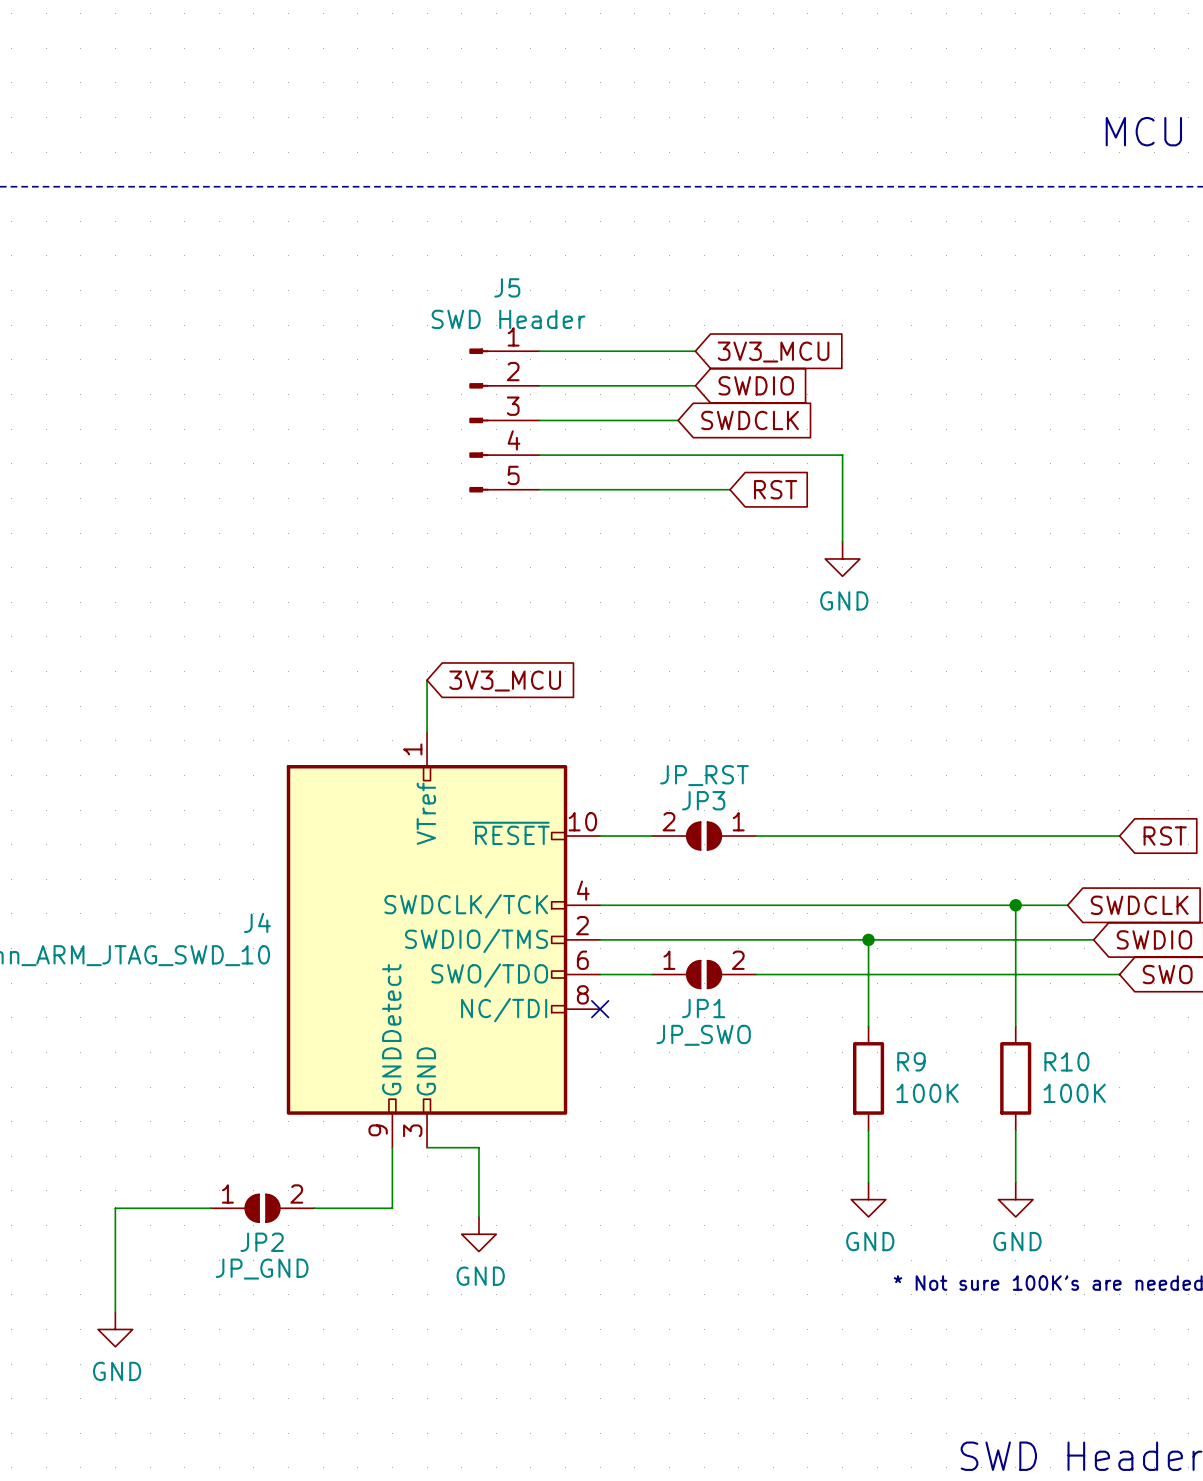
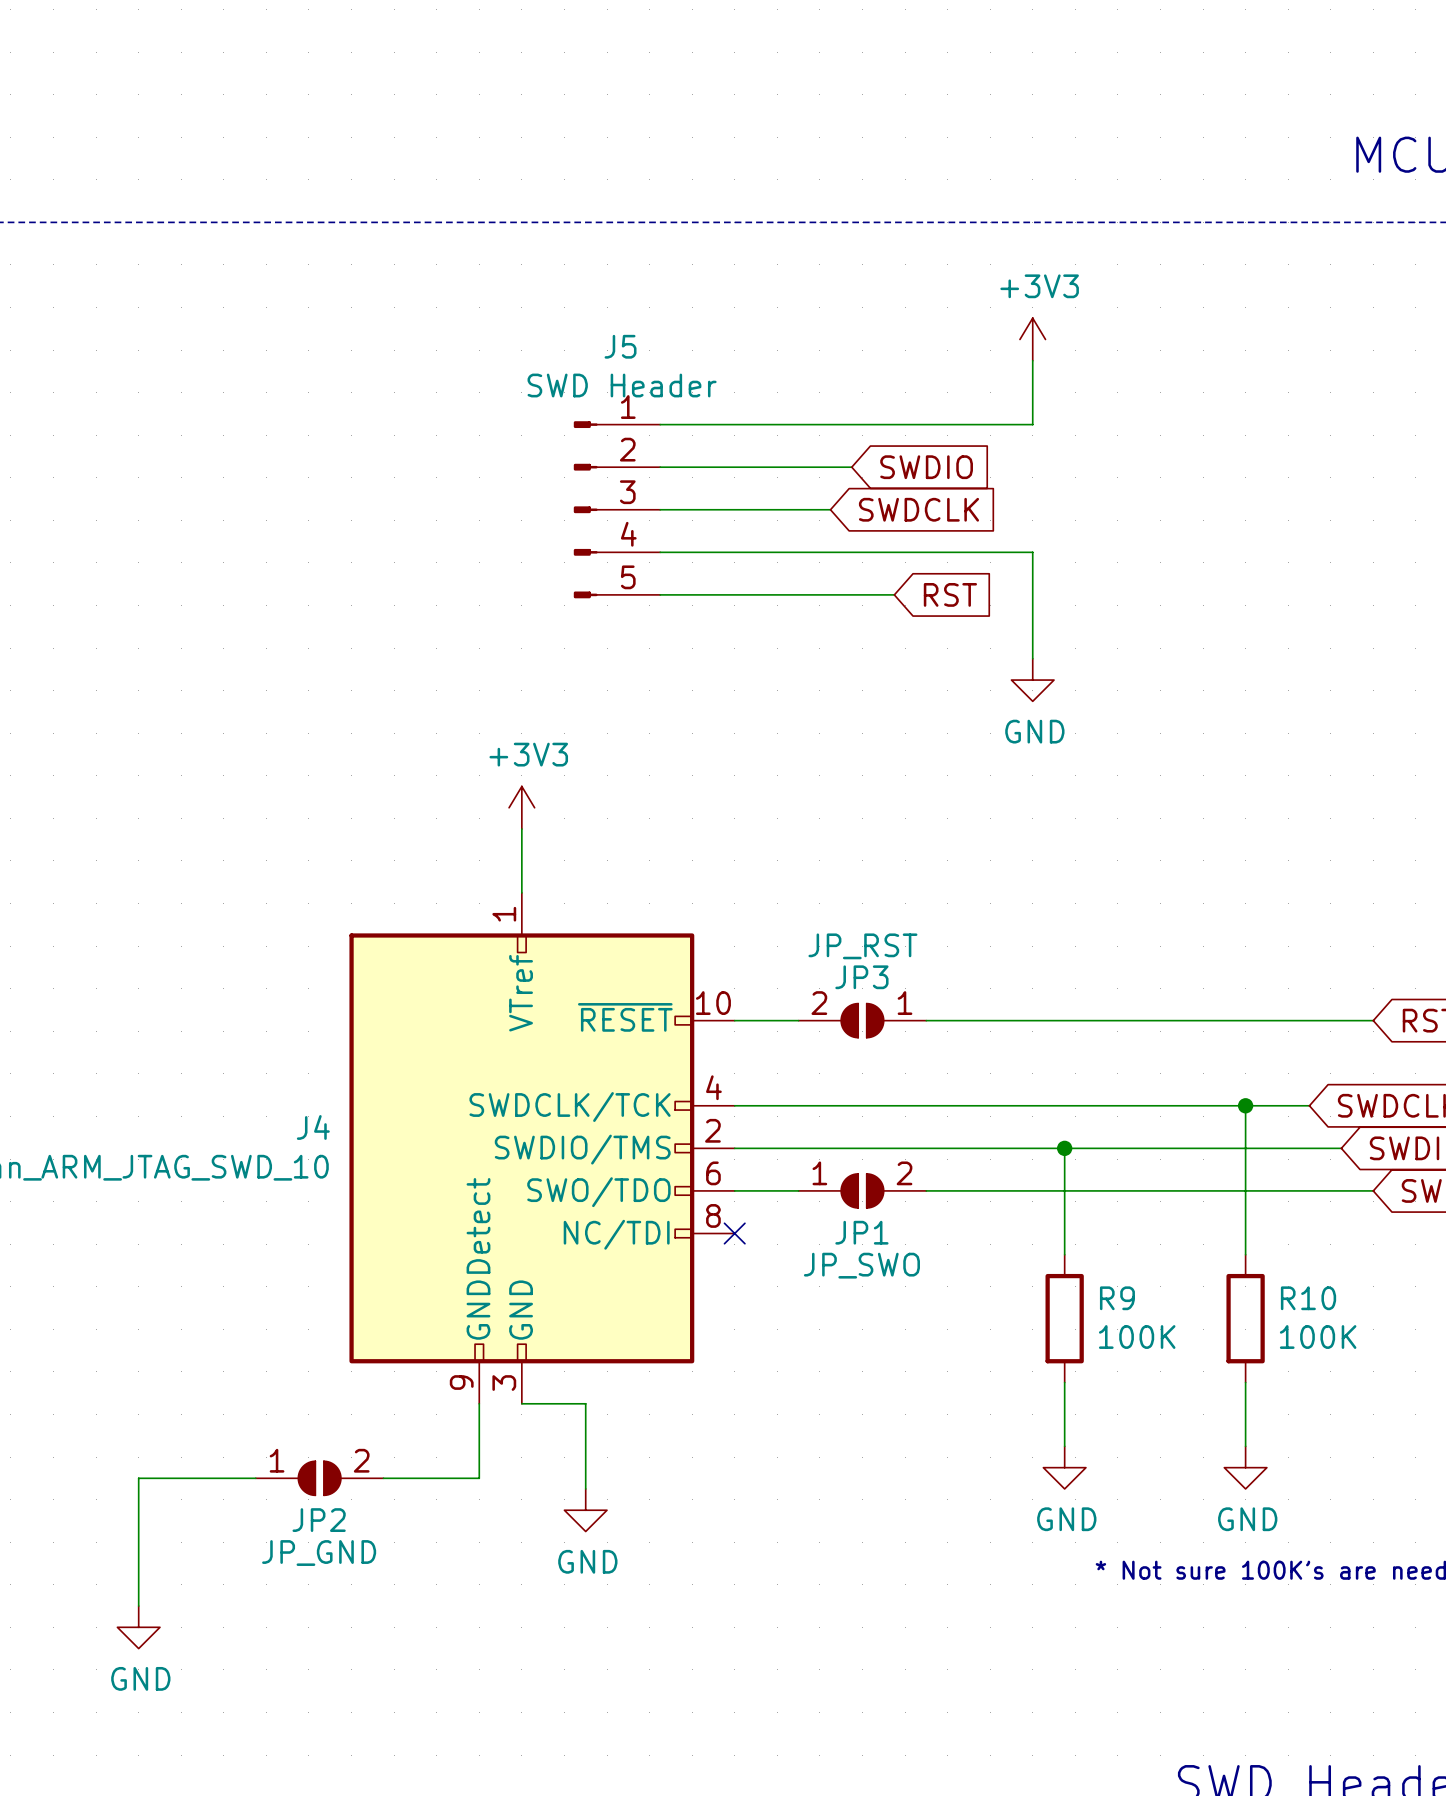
power symbol: none -> +3V3 (1032, 339)
wire: none -> (1032, 360) (1032, 424) (851, 424)
global label: 3V3_MCU (773, 352) -> none
power symbol: none -> +3V3 (521, 807)
global label: 3V3_MCU (505, 681) -> none

